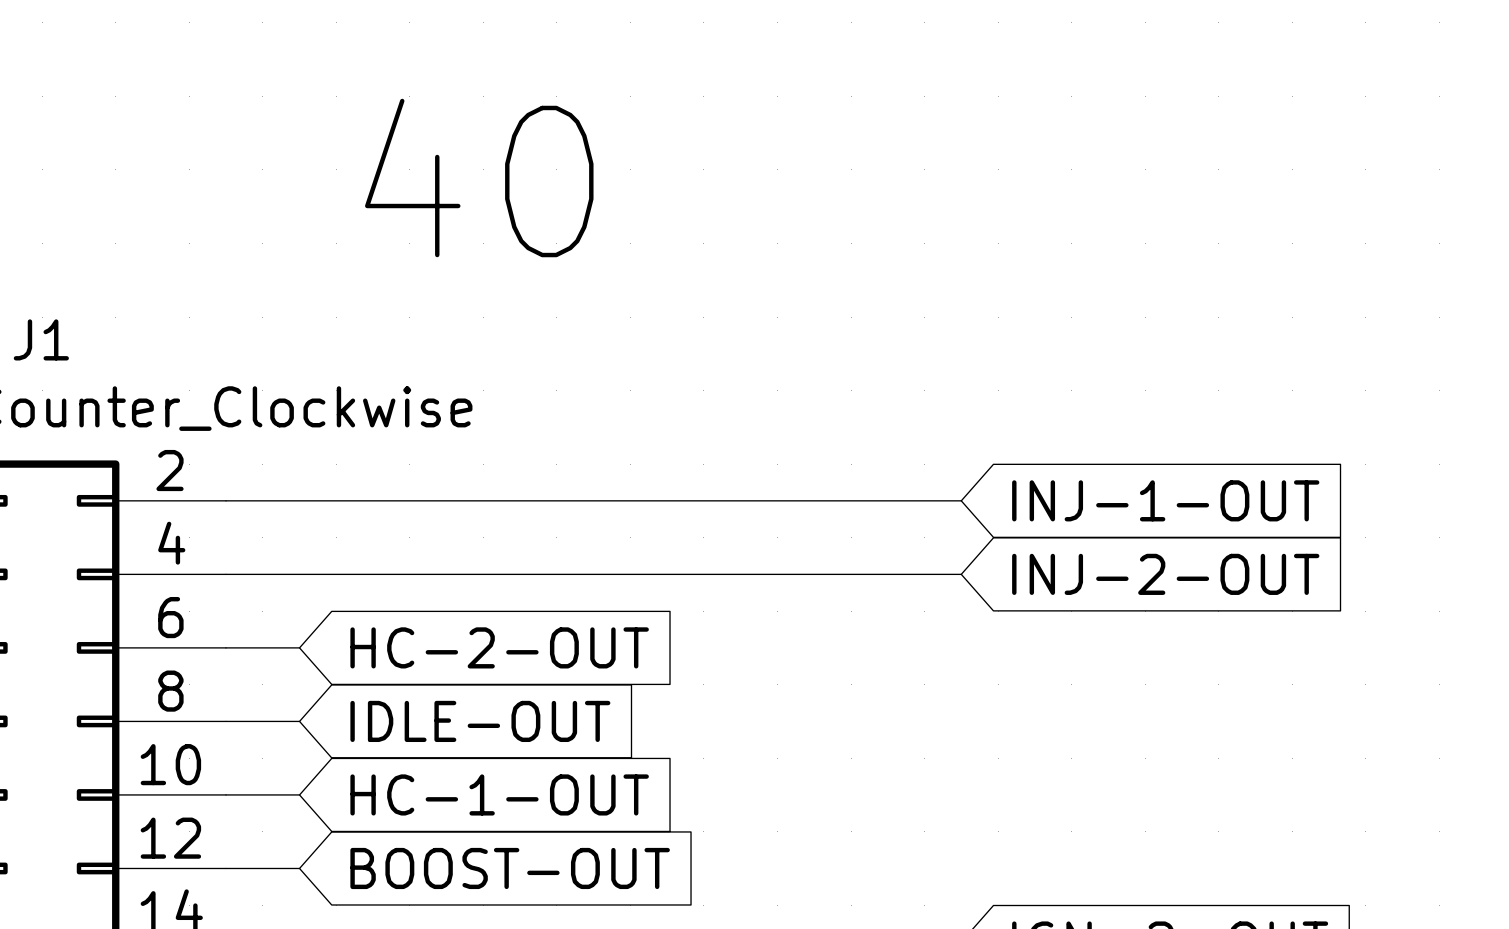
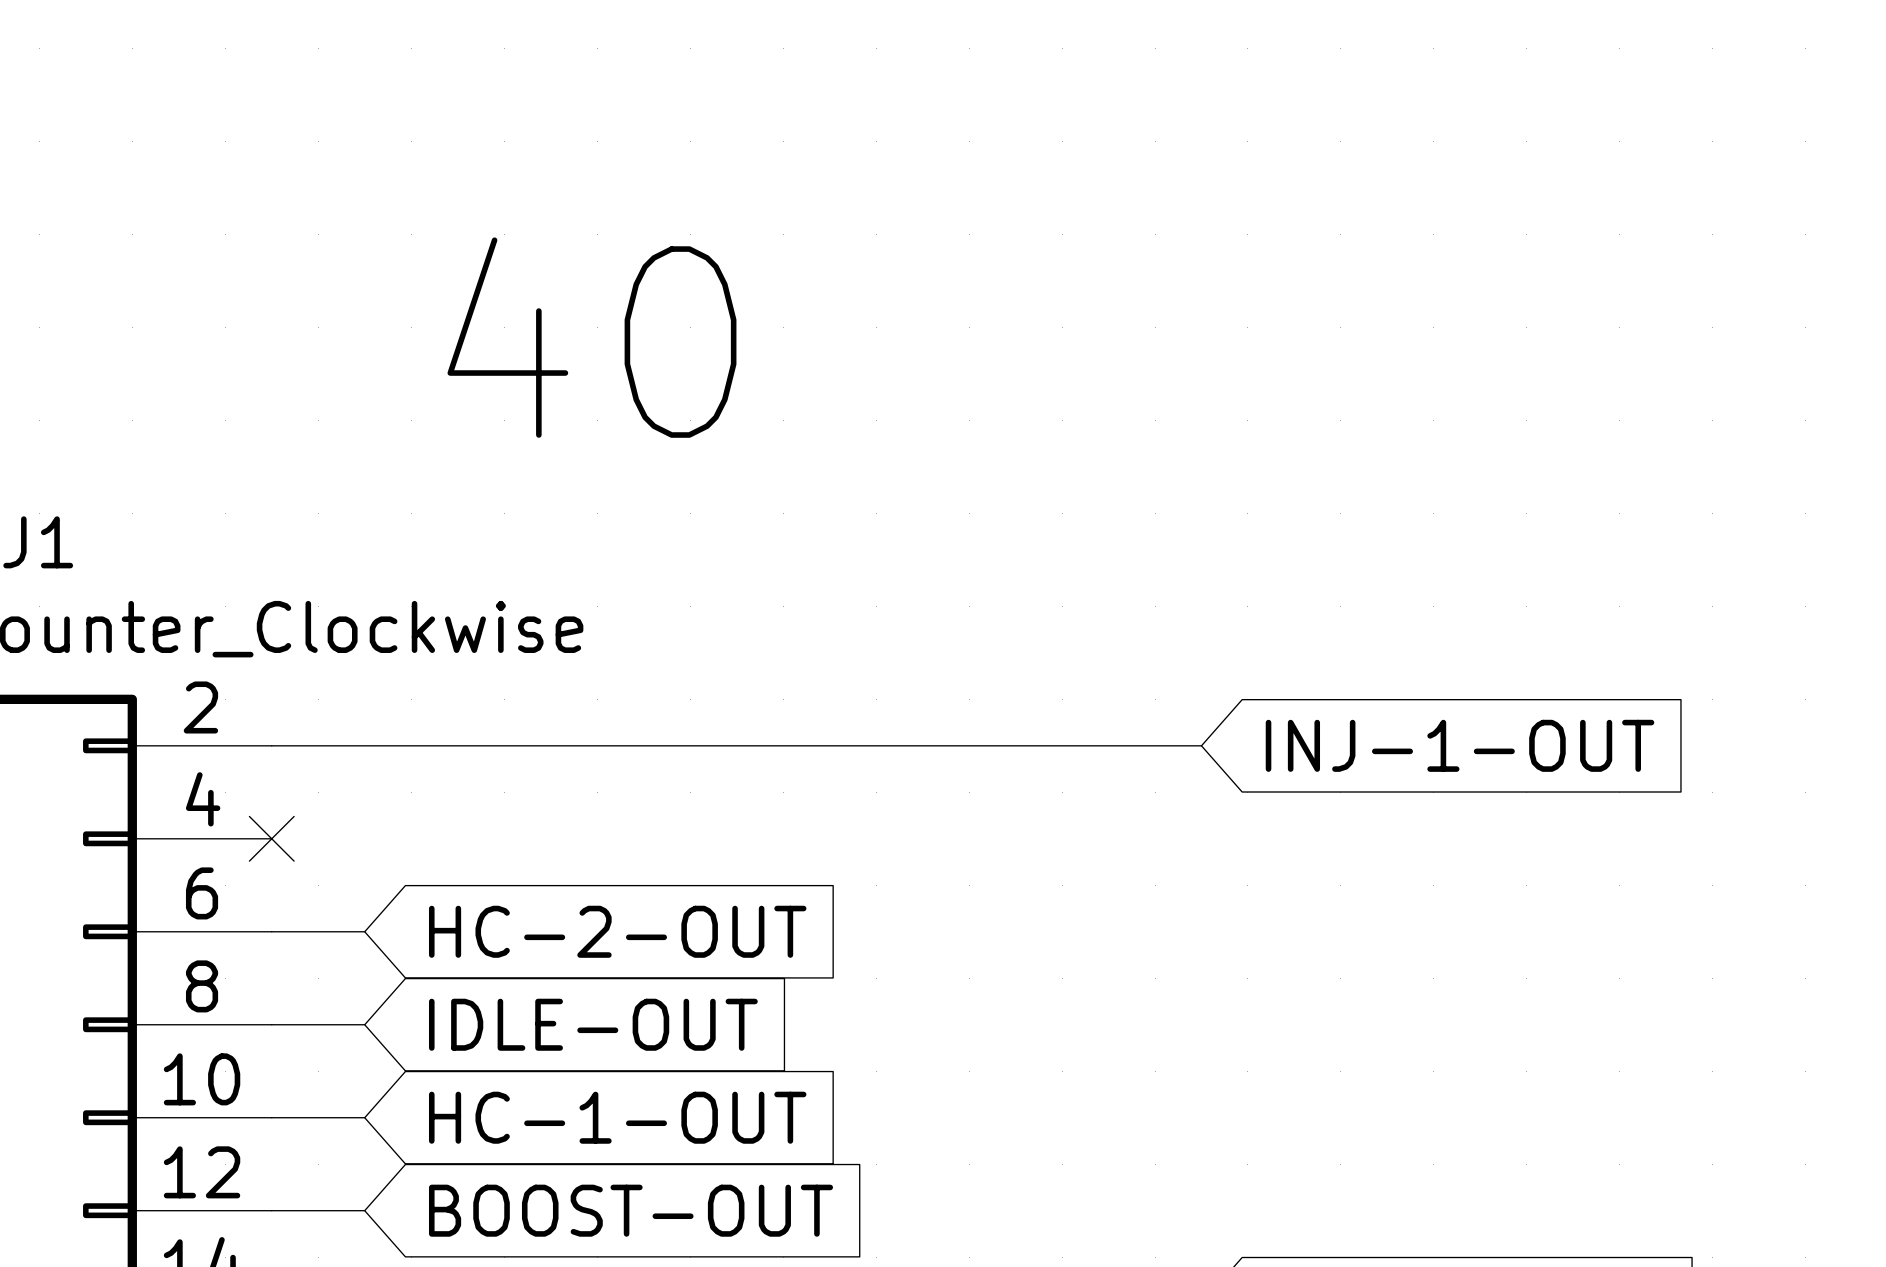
wire: (226, 574) (961, 574) -> none
no-connect mark: none -> (271, 838)
global label: INJ-2-OUT (1165, 574) -> none

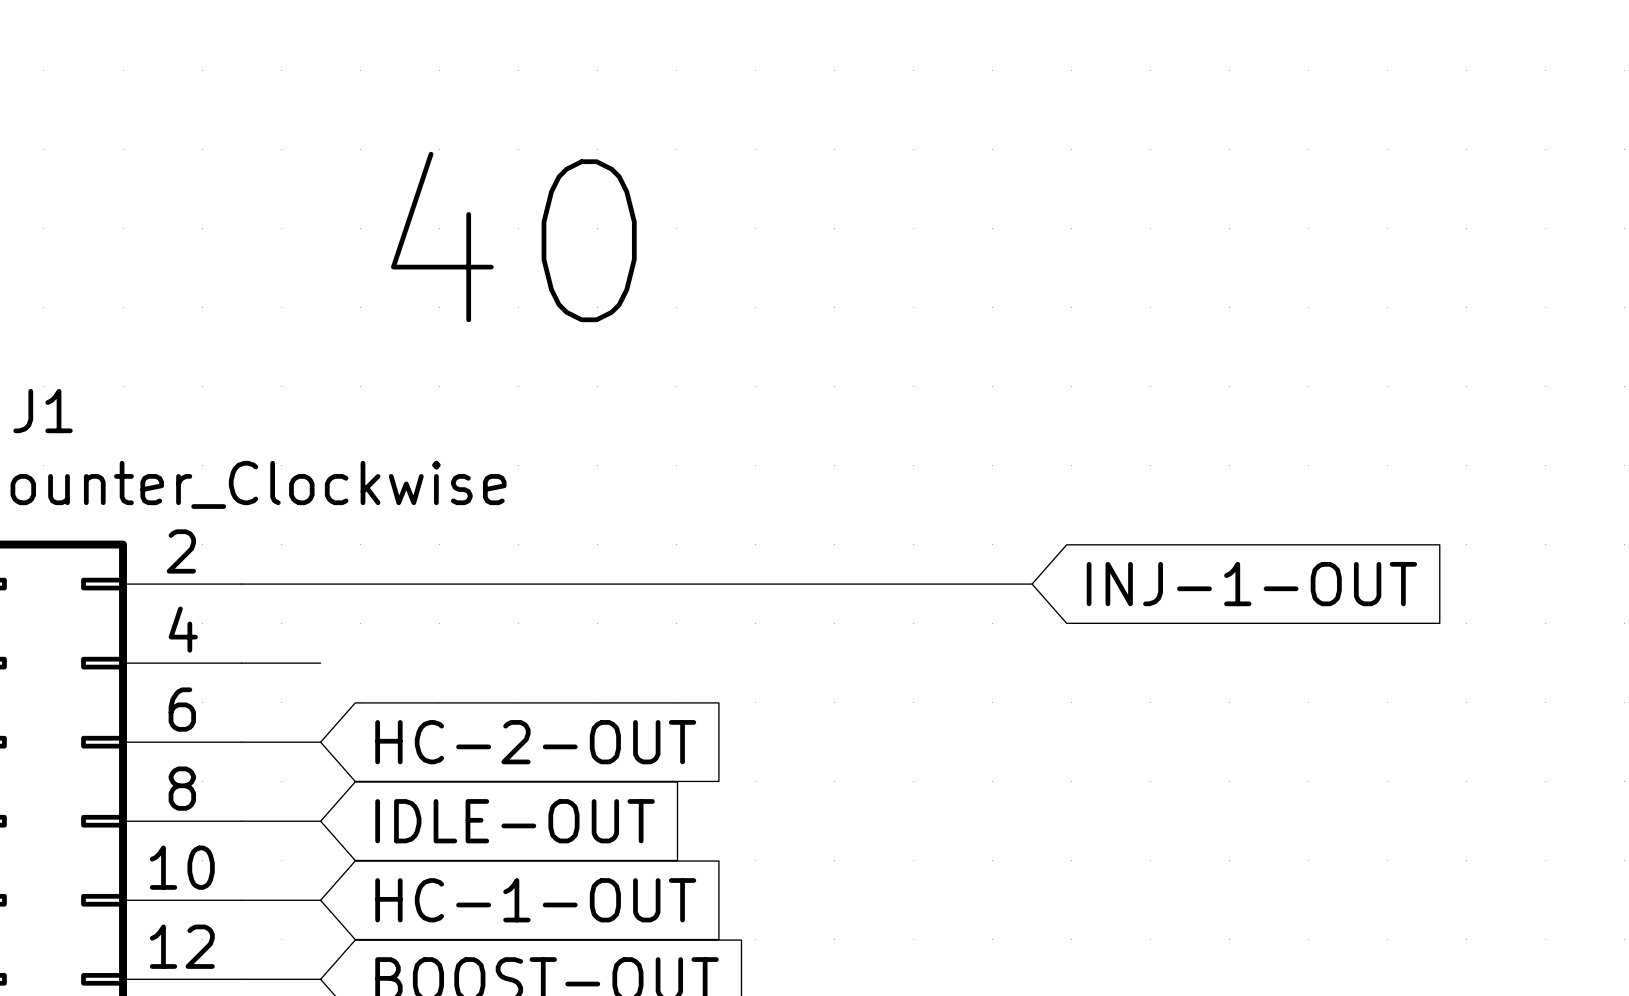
wire: none -> (241, 663) (320, 663)
no-connect mark: (271, 838) -> none

